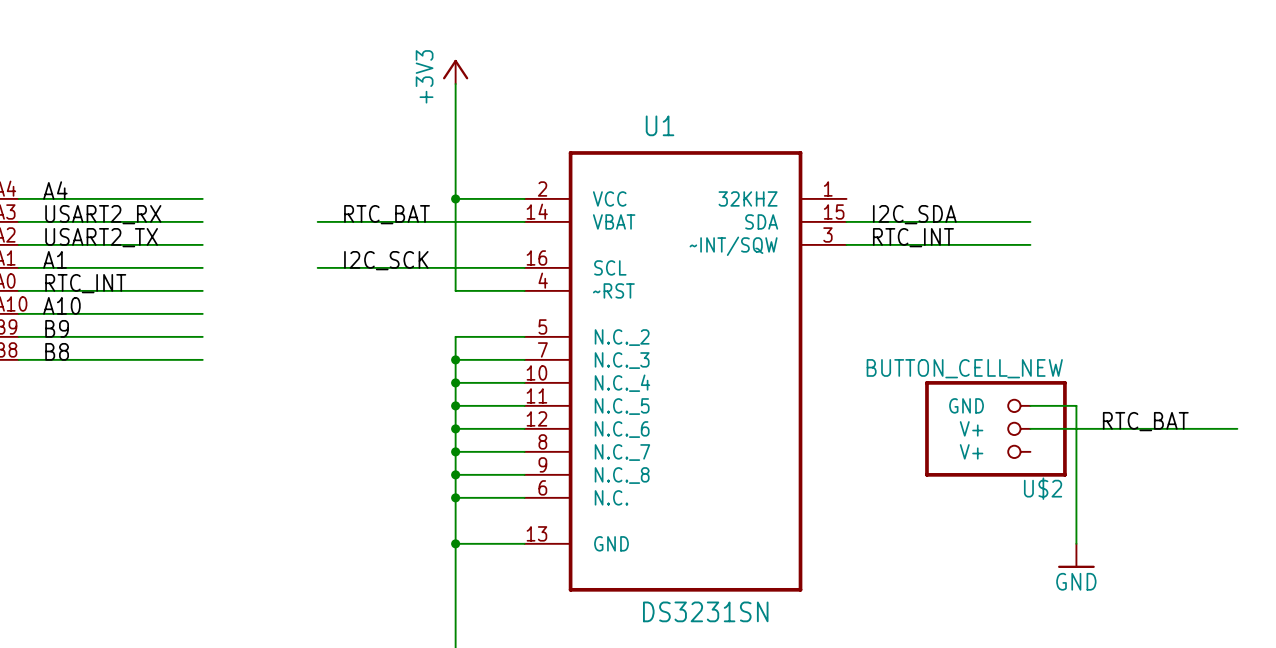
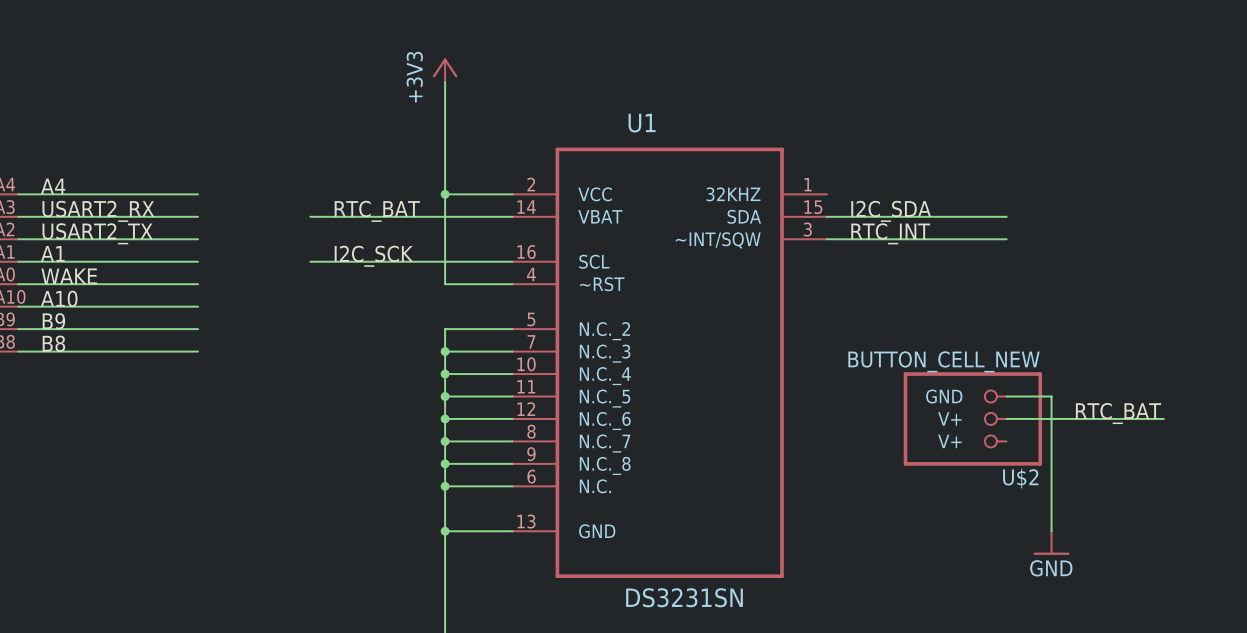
label: RTC_INT (85, 283) -> WAKE (69, 276)
wire: (1191, 428) (1237, 428) -> none

